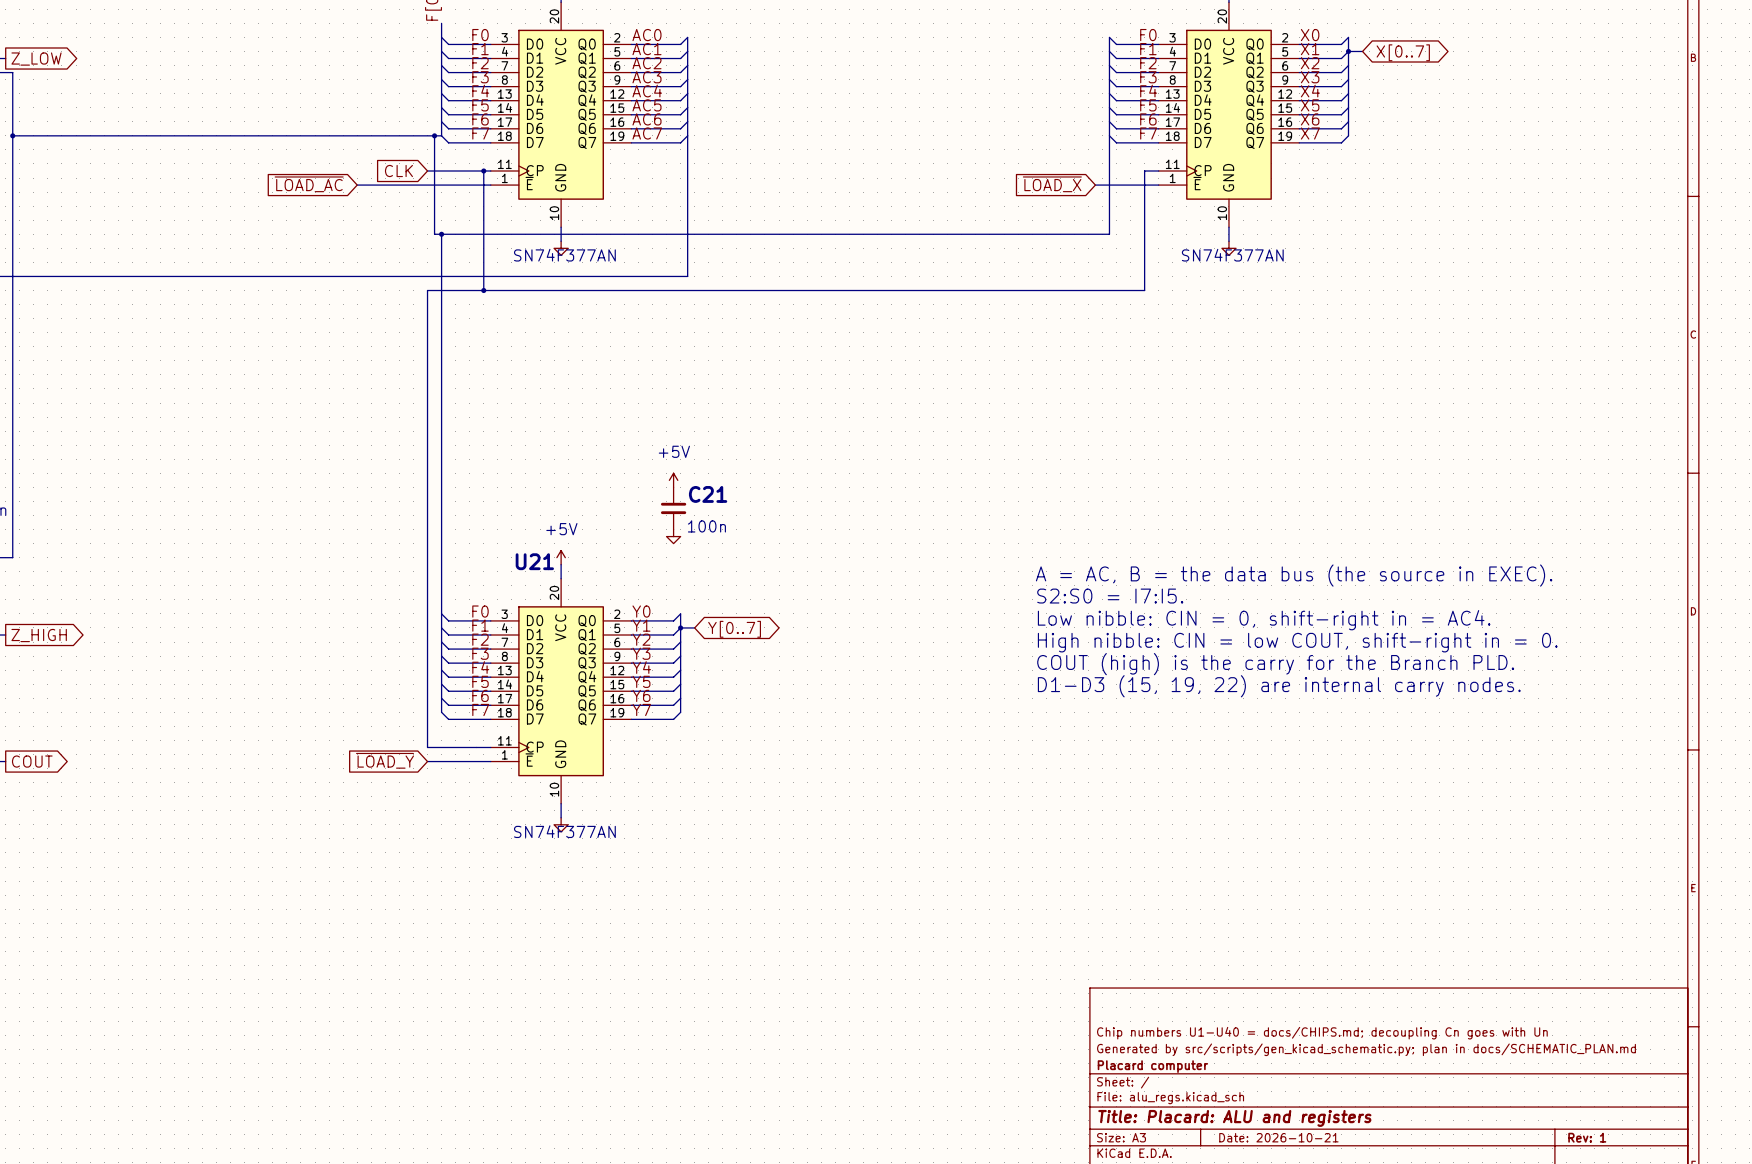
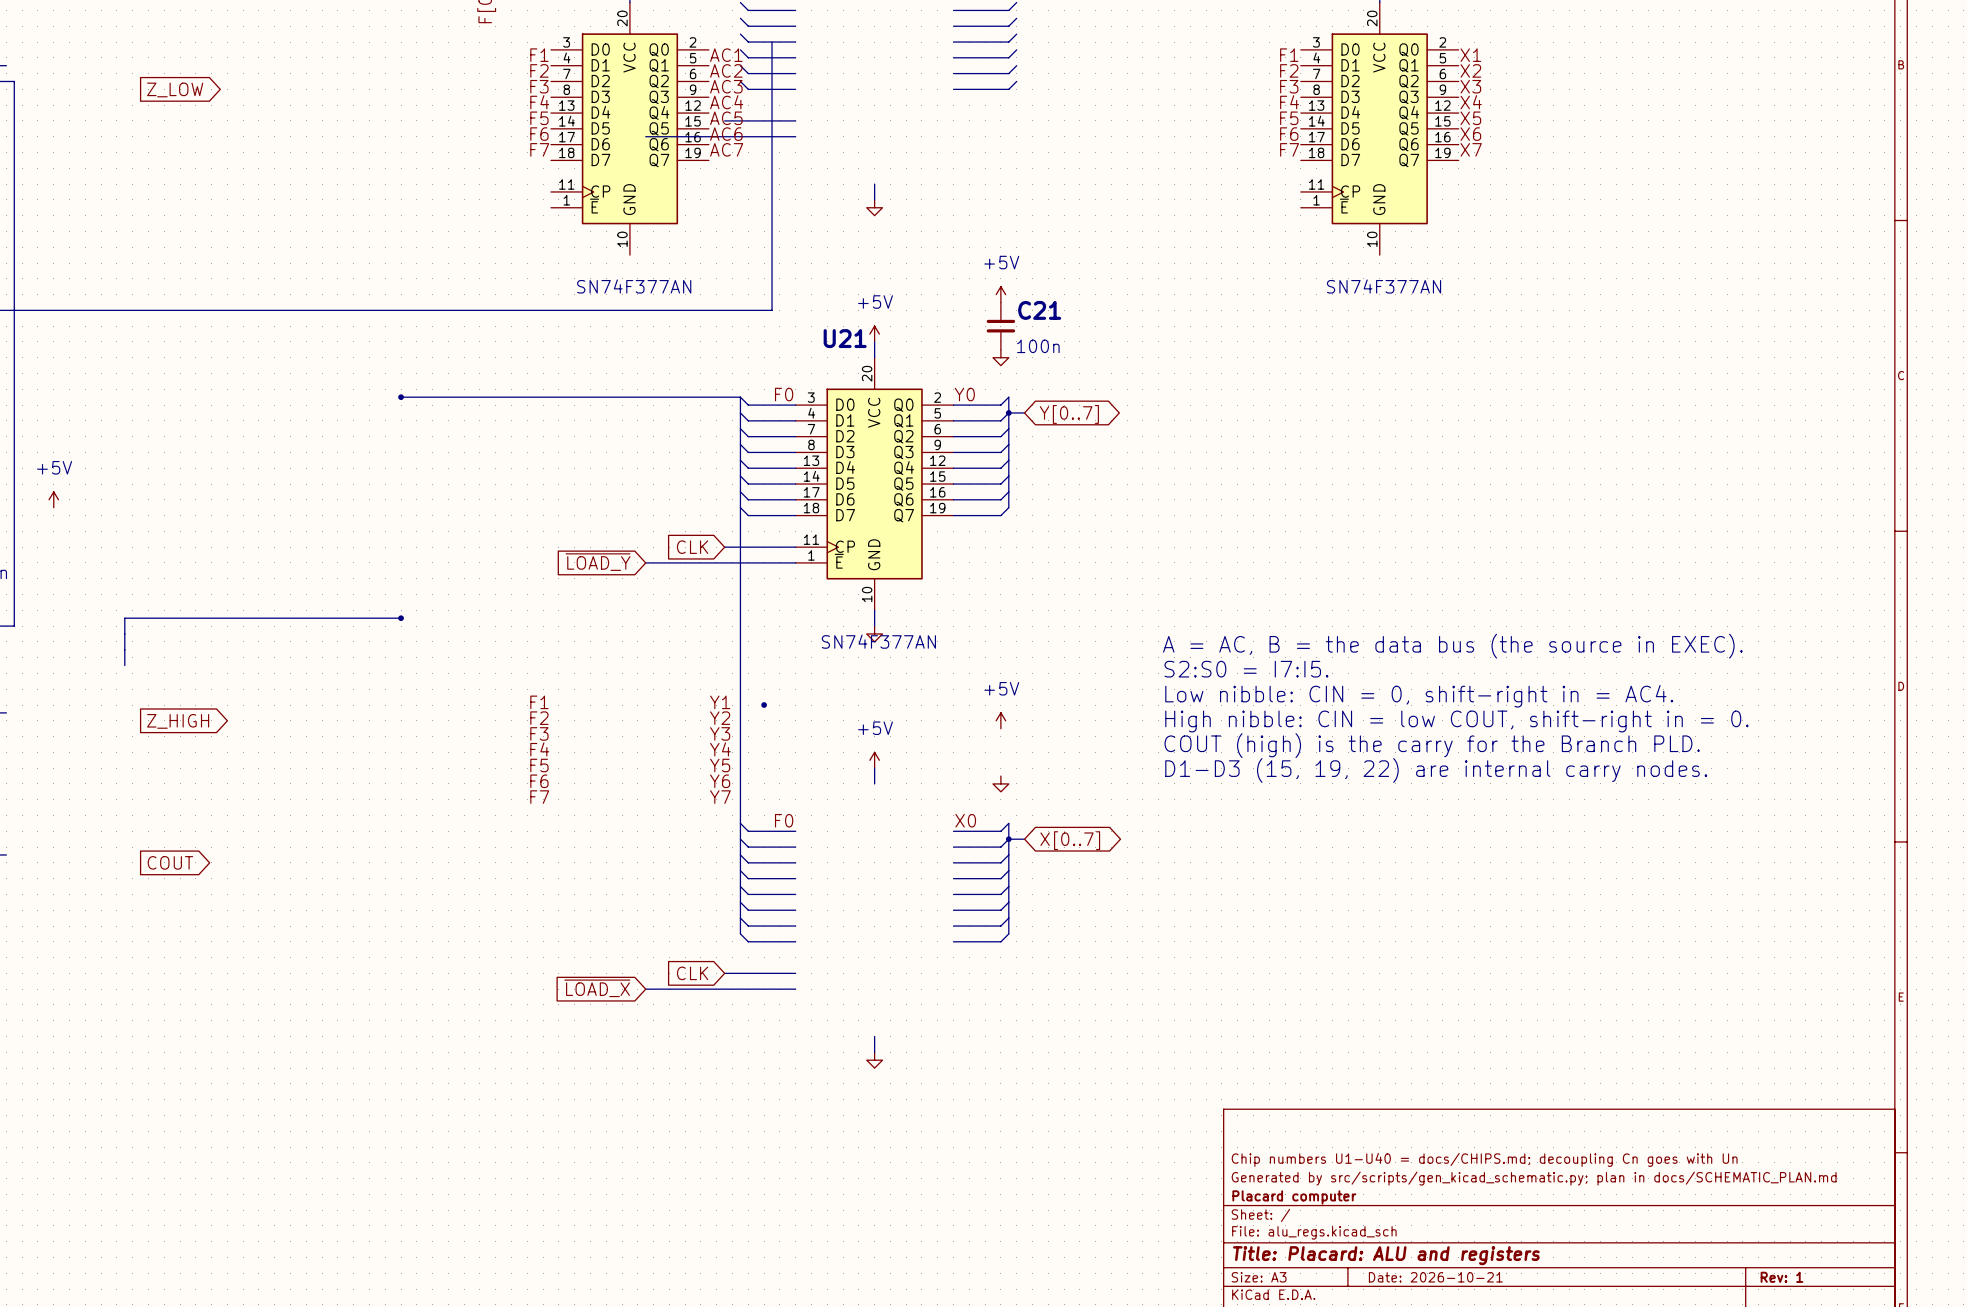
wire: none -> (740, 2) (748, 10) (795, 10)
wire: none -> (1016, 2) (1008, 10) (953, 10)
wire: none -> (740, 18) (748, 26) (795, 26)
wire: none -> (1016, 18) (1008, 26) (953, 26)
bus: (441, 23) (441, 135) (12, 135) -> none
wire: none -> (740, 34) (748, 42) (795, 42)
wire: none -> (1016, 34) (1008, 42) (953, 42)
label: F0 (480, 35) -> none
label: AC0 (646, 35) -> none
label: F0 (1148, 35) -> none
label: X0 (1310, 35) -> none
wire: (441, 37) (448, 44) (490, 44) -> none
wire: (687, 37) (680, 44) (631, 44) -> none
wire: (1109, 37) (1116, 44) (1158, 44) -> none
bus: (1109, 37) (1109, 234) (434, 234) (434, 135) -> none
wire: (1348, 37) (1341, 44) (1299, 44) -> none
bus: (1348, 37) (1348, 135) -> none
wire: none -> (740, 49) (748, 57) (795, 57)
wire: none -> (1016, 49) (1008, 57) (953, 57)
wire: (441, 51) (448, 58) (490, 58) -> none
wire: (687, 51) (680, 58) (631, 58) -> none
wire: (1109, 51) (1116, 58) (1158, 58) -> none
wire: (1348, 51) (1341, 58) (1299, 58) -> none
bus: (1348, 51) (1362, 51) -> none
junction: (1348, 51) -> none
global label: X[0..7] (1403, 52) -> none
wire: none -> (740, 65) (748, 73) (795, 73)
wire: none -> (1016, 65) (1008, 73) (953, 73)
global label position: Z_LOW (36, 59) -> Z_LOW (175, 89)
wire: (441, 65) (448, 72) (490, 72) -> none
wire: (687, 65) (680, 72) (631, 72) -> none
wire: (1109, 65) (1116, 72) (1158, 72) -> none
wire: (1348, 65) (1341, 72) (1299, 72) -> none
wire: none -> (740, 81) (748, 89) (795, 89)
wire: none -> (1016, 81) (1008, 89) (953, 89)
wire: (441, 79) (448, 86) (490, 86) -> none
wire: (687, 79) (680, 86) (631, 86) -> none
wire: (1109, 79) (1116, 86) (1158, 86) -> none
wire: (1348, 79) (1341, 86) (1299, 86) -> none
wire: (441, 93) (448, 100) (490, 100) -> none
wire: (687, 93) (680, 100) (631, 100) -> none
wire: (1109, 93) (1116, 100) (1158, 100) -> none
wire: (1348, 93) (1341, 100) (1299, 100) -> none
wire: (441, 107) (448, 114) (490, 114) -> none
wire: none -> (724, 120) (795, 120)
wire: (687, 107) (680, 114) (631, 114) -> none
wire: (1109, 107) (1116, 114) (1158, 114) -> none
wire: (1348, 107) (1341, 114) (1299, 114) -> none
wire: (441, 121) (448, 128) (490, 128) -> none
wire: none -> (645, 136) (795, 136)
wire: (687, 121) (680, 128) (631, 128) -> none
wire: (1109, 121) (1116, 128) (1158, 128) -> none
wire: (1348, 121) (1341, 128) (1299, 128) -> none
junction: (12, 135) -> none
junction: (434, 135) -> none
wire: (441, 135) (448, 142) (490, 142) -> none
wire: (687, 135) (680, 142) (631, 142) -> none
wire: (1109, 135) (1116, 142) (1158, 142) -> none
wire: (1348, 135) (1341, 142) (1299, 142) -> none
wire: none -> (874, 184) (874, 199)
global label: CLK (398, 171) -> none
wire: (427, 171) (490, 171) -> none
wire: (483, 171) (483, 290) -> none
junction: (483, 171) -> none
wire: (1158, 171) (1144, 171) (1144, 290) (427, 290) (427, 747) (490, 747) -> none
global label: ~{LOAD_AC} (309, 184) -> none
global label: ~{LOAD_X} (1052, 184) -> none
wire: (357, 185) (490, 185) -> none
power symbol: none -> (874, 207)
wire: (1095, 185) (1158, 185) -> none
wire: (561, 227) (561, 241) -> none
wire: (1228, 227) (1228, 241) -> none
bus: (441, 234) (441, 712) -> none
junction: (441, 234) -> none
power symbol: (561, 248) -> none
power symbol: (1228, 248) -> none
power symbol: none -> +5V (1000, 294)
junction: (483, 290) -> none
power symbol: none -> +5V (874, 334)
wire: none -> (874, 341) (874, 357)
power symbol: none -> (1000, 357)
label: none -> F0 (784, 394)
label: none -> Y0 (964, 394)
bus: none -> (401, 397) (740, 397) (740, 933)
junction: none -> (401, 397)
wire: none -> (740, 397) (748, 405) (795, 405)
wire: none -> (1008, 397) (1000, 405) (953, 405)
bus: none -> (1008, 397) (1008, 507)
wire: none -> (740, 412) (748, 420) (795, 420)
wire: none -> (1008, 412) (1000, 420) (953, 420)
bus: none -> (1008, 412) (1024, 412)
junction: none -> (1008, 412)
global label: none -> Y[0..7] (1069, 414)
wire: none -> (740, 428) (748, 436) (795, 436)
wire: none -> (1008, 428) (1000, 436) (953, 436)
wire: none -> (740, 444) (748, 452) (795, 452)
wire: none -> (1008, 444) (1000, 452) (953, 452)
wire: none -> (740, 460) (748, 468) (795, 468)
wire: none -> (1008, 460) (1000, 468) (953, 468)
wire: none -> (740, 476) (748, 484) (795, 484)
wire: none -> (1008, 476) (1000, 484) (953, 484)
wire: none -> (740, 491) (748, 499) (795, 499)
wire: none -> (1008, 491) (1000, 499) (953, 499)
power symbol: none -> +5V (53, 499)
wire: none -> (740, 507) (748, 515) (795, 515)
wire: none -> (1008, 507) (1000, 515) (953, 515)
power symbol: +5V (673, 480) -> none
global label: none -> CLK (692, 547)
wire: none -> (724, 547) (795, 547)
global label: none -> ~{LOAD_Y} (598, 562)
wire: none -> (645, 562) (795, 562)
C21 position: (673, 508) -> (1000, 326)
power symbol position: (673, 536) -> (874, 633)
wire: none -> (874, 610) (874, 626)
bus: none -> (401, 618) (124, 618) (124, 665)
junction: none -> (401, 618)
power symbol: +5V (561, 557) -> none
wire: (561, 564) (561, 578) -> none
label: F0 (480, 611) -> none
label: Y0 (641, 611) -> none
wire: (441, 613) (448, 620) (490, 620) -> none
wire: (680, 613) (673, 620) (631, 620) -> none
bus: (680, 613) (680, 712) -> none
wire: (441, 627) (448, 635) (490, 635) -> none
wire: (680, 627) (673, 635) (631, 635) -> none
bus: (680, 627) (694, 627) -> none
global label: Y[0..7] (734, 629) -> none
global label position: Z_HIGH (39, 635) -> Z_HIGH (178, 721)
wire: (441, 642) (448, 649) (490, 649) -> none
wire: (680, 642) (673, 649) (631, 649) -> none
power symbol: none -> +5V (1000, 720)
wire: (441, 656) (448, 663) (490, 663) -> none
wire: (680, 656) (673, 663) (631, 663) -> none
wire: (441, 670) (448, 677) (490, 677) -> none
wire: (680, 670) (673, 677) (631, 677) -> none
power symbol: none -> +5V (874, 760)
wire: (441, 684) (448, 691) (490, 691) -> none
wire: (680, 684) (673, 691) (631, 691) -> none
wire: none -> (874, 768) (874, 783)
U21 position: (561, 691) -> (874, 484)
wire: (441, 698) (448, 705) (490, 705) -> none
wire: (680, 698) (673, 705) (631, 705) -> none
power symbol: none -> (1000, 783)
wire: (441, 712) (448, 719) (490, 719) -> none
wire: (680, 712) (673, 719) (631, 719) -> none
label: none -> F0 (784, 820)
label: none -> X0 (965, 820)
wire: none -> (740, 823) (748, 831) (795, 831)
wire: none -> (1008, 823) (1000, 831) (953, 831)
bus: none -> (1008, 823) (1008, 933)
wire: none -> (740, 839) (748, 847) (795, 847)
wire: none -> (1008, 839) (1000, 847) (953, 847)
bus: none -> (1008, 839) (1024, 839)
junction: none -> (1008, 839)
global label: none -> X[0..7] (1070, 840)
global label: ~{LOAD_Y} (385, 760) -> none
global label position: COUT (32, 761) -> COUT (170, 862)
wire: (427, 761) (490, 761) -> none
wire: none -> (740, 854) (748, 862) (795, 862)
wire: none -> (1008, 854) (1000, 862) (953, 862)
wire: none -> (740, 870) (748, 878) (795, 878)
wire: none -> (1008, 870) (1000, 878) (953, 878)
wire: none -> (740, 886) (748, 894) (795, 894)
wire: none -> (1008, 886) (1000, 894) (953, 894)
wire: (561, 803) (561, 817) -> none
wire: none -> (740, 902) (748, 910) (795, 910)
wire: none -> (1008, 902) (1000, 910) (953, 910)
wire: none -> (740, 918) (748, 926) (795, 926)
wire: none -> (1008, 918) (1000, 926) (953, 926)
power symbol: (561, 824) -> none
wire: none -> (740, 933) (748, 941) (795, 941)
wire: none -> (1008, 933) (1000, 941) (953, 941)
global label: none -> CLK (692, 973)
wire: none -> (724, 973) (795, 973)
global label: none -> ~{LOAD_X} (597, 988)
wire: none -> (645, 989) (795, 989)
wire: none -> (874, 1036) (874, 1052)
power symbol: none -> (874, 1060)

